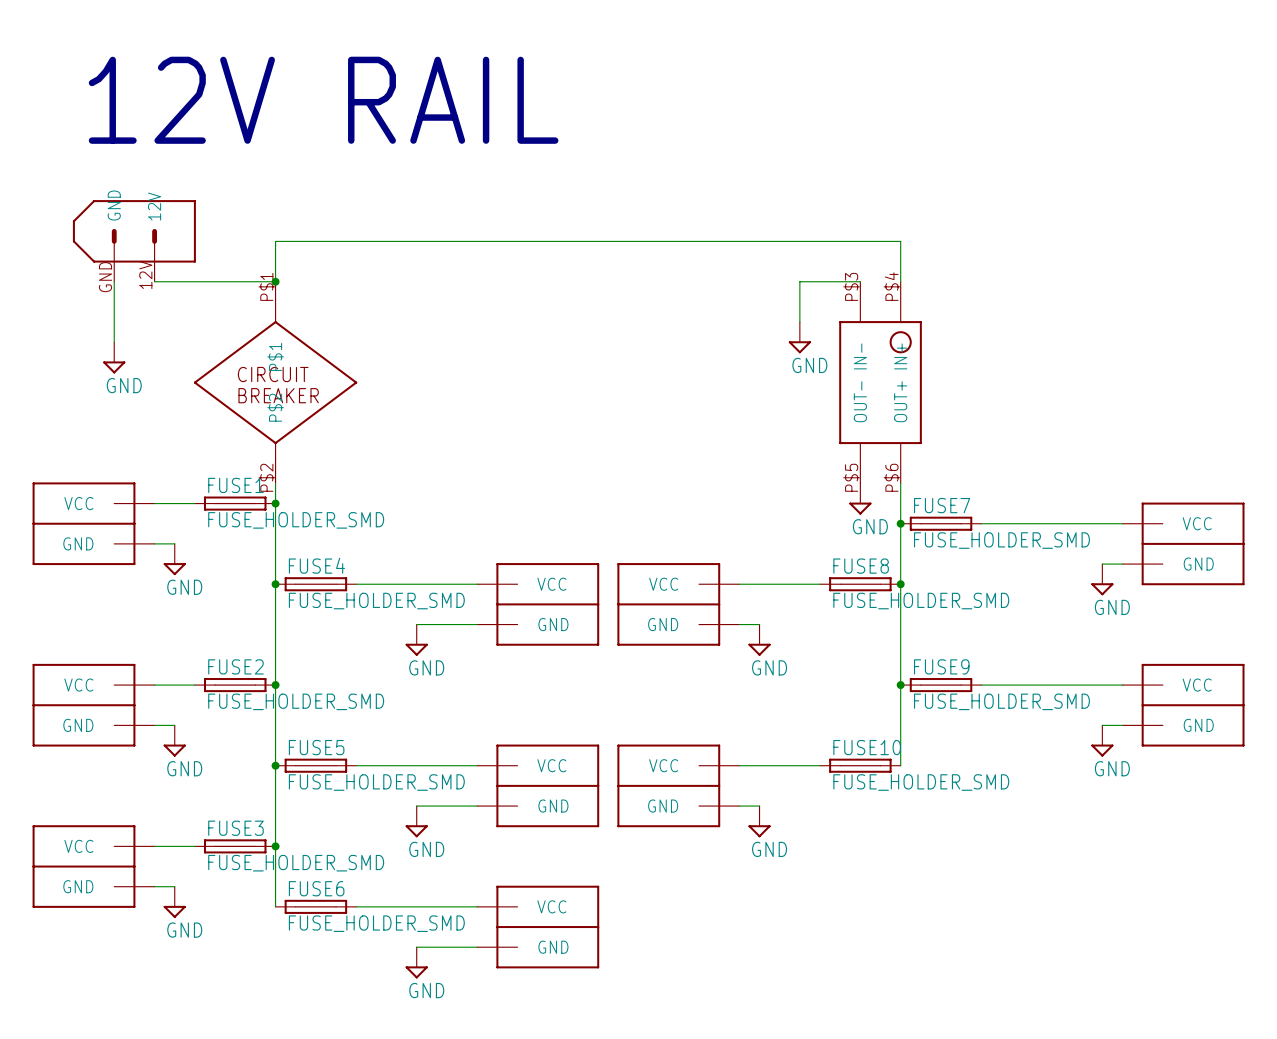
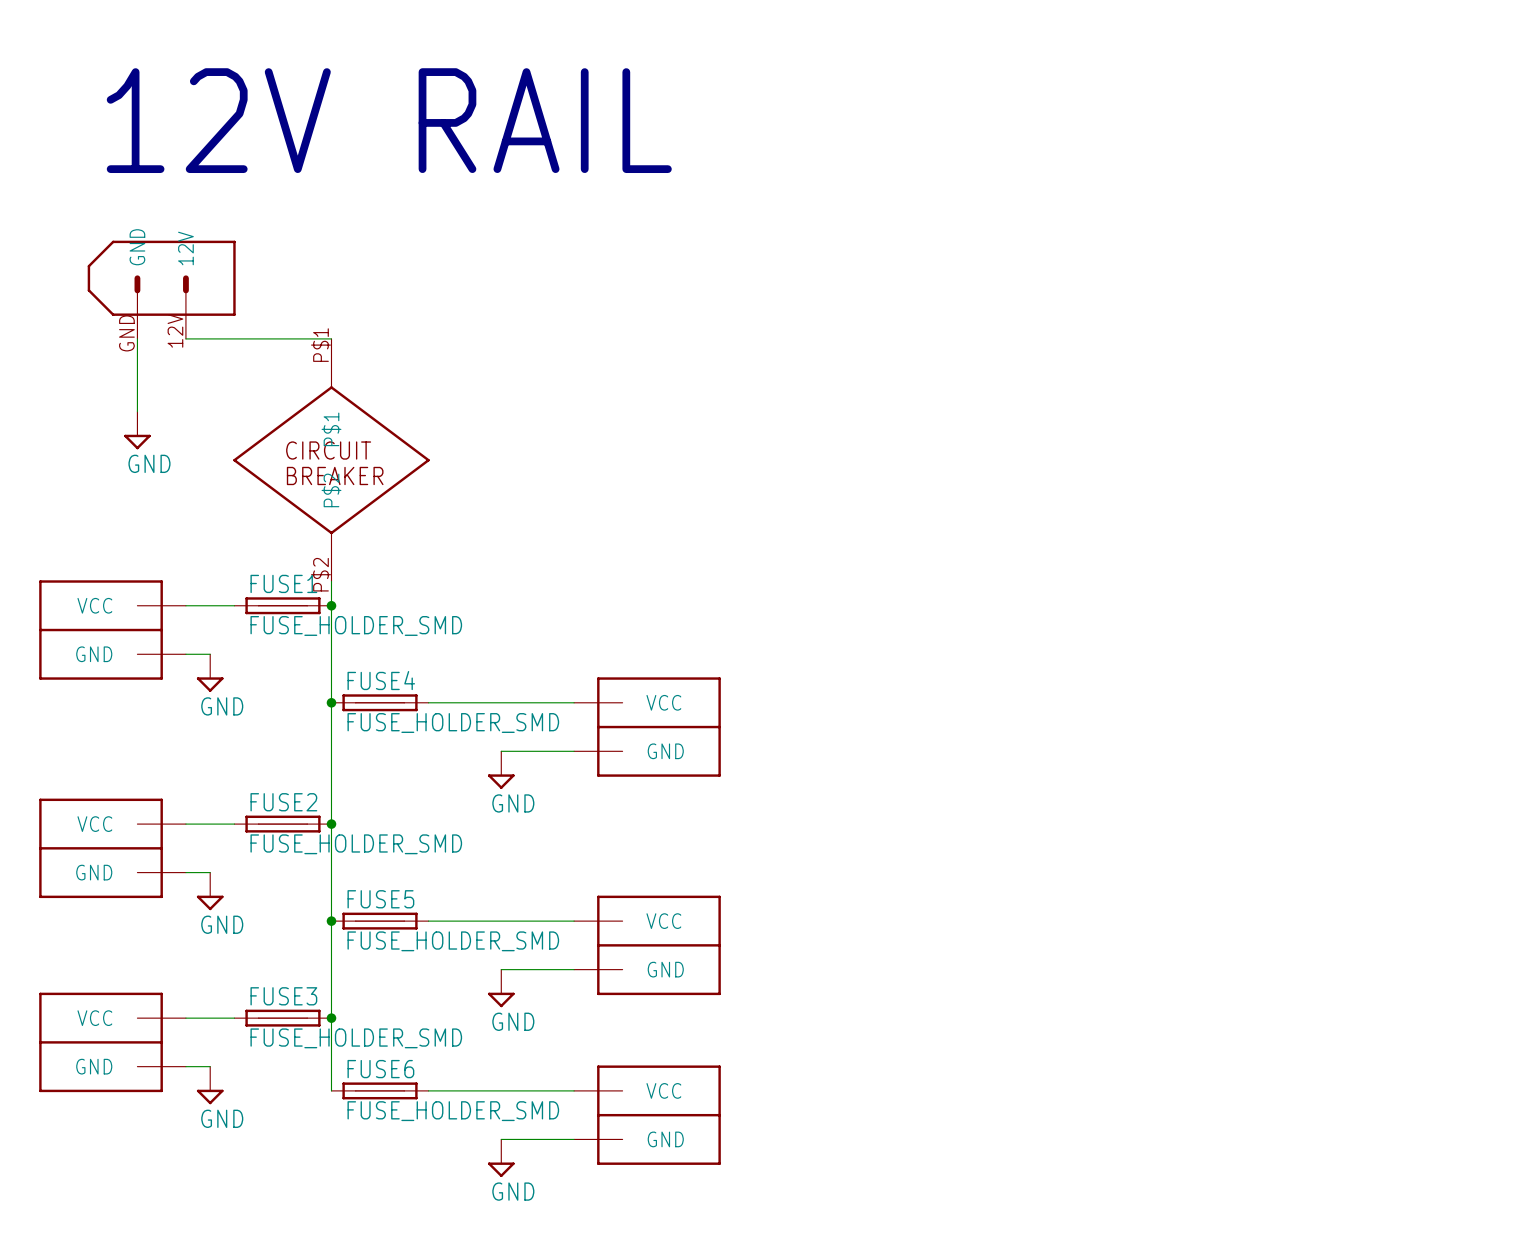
wire: (275, 281) (275, 241) (900, 241) (900, 281) -> none
junction: (275, 281) -> none
wire: (860, 281) (799, 281) (799, 322) -> none
power symbol: GND (799, 337) -> none
part: (880, 382) -> none
wire: (900, 483) (900, 765) -> none
power symbol: GND (860, 499) -> none
junction: (900, 523) -> none
FUSE7: FUSE_HOLDER_SMD (941, 523) -> none
wire: (981, 523) (1122, 523) -> none
part: (1183, 543) -> none
wire: (1102, 564) (1122, 564) -> none
power symbol: GND (1102, 579) -> none
wire: (739, 584) (820, 584) -> none
FUSE8: FUSE_HOLDER_SMD (860, 584) -> none
junction: (900, 584) -> none
part: (678, 604) -> none
wire: (739, 624) (759, 624) -> none
power symbol: GND (759, 640) -> none
junction: (900, 685) -> none
FUSE9: FUSE_HOLDER_SMD (941, 685) -> none
wire: (981, 685) (1122, 685) -> none
part: (1183, 705) -> none
wire: (1102, 725) (1122, 725) -> none
power symbol: GND (1102, 741) -> none
wire: (739, 765) (820, 765) -> none
FUSE10: FUSE_HOLDER_SMD (860, 765) -> none
part: (678, 785) -> none
wire: (739, 806) (759, 806) -> none
power symbol: GND (759, 821) -> none

